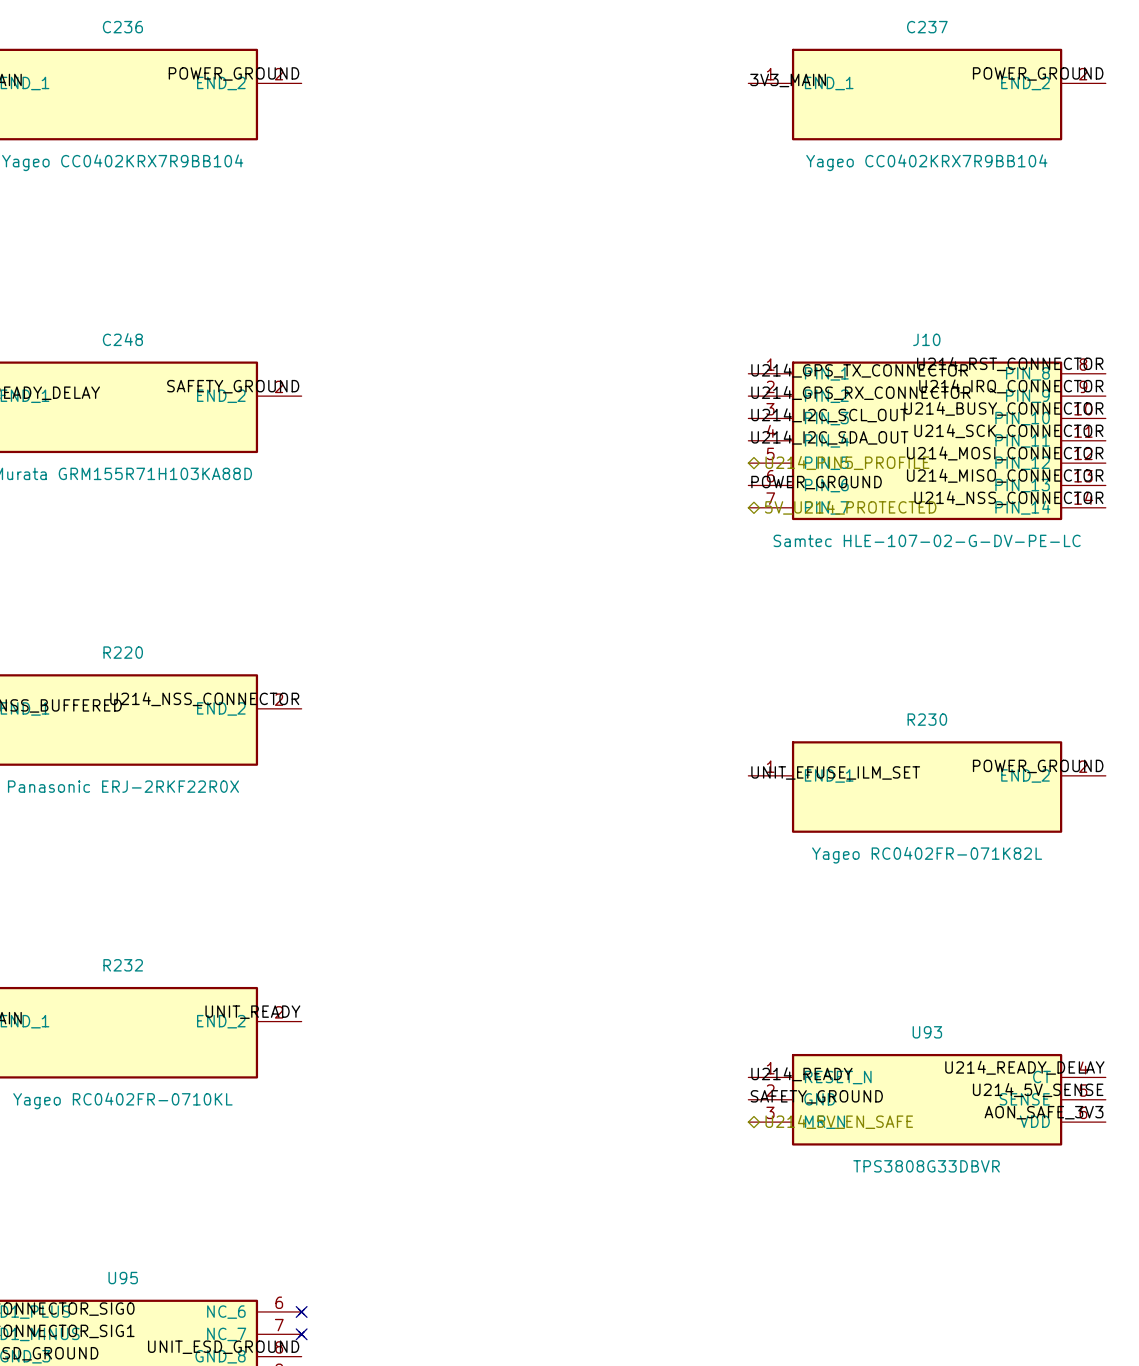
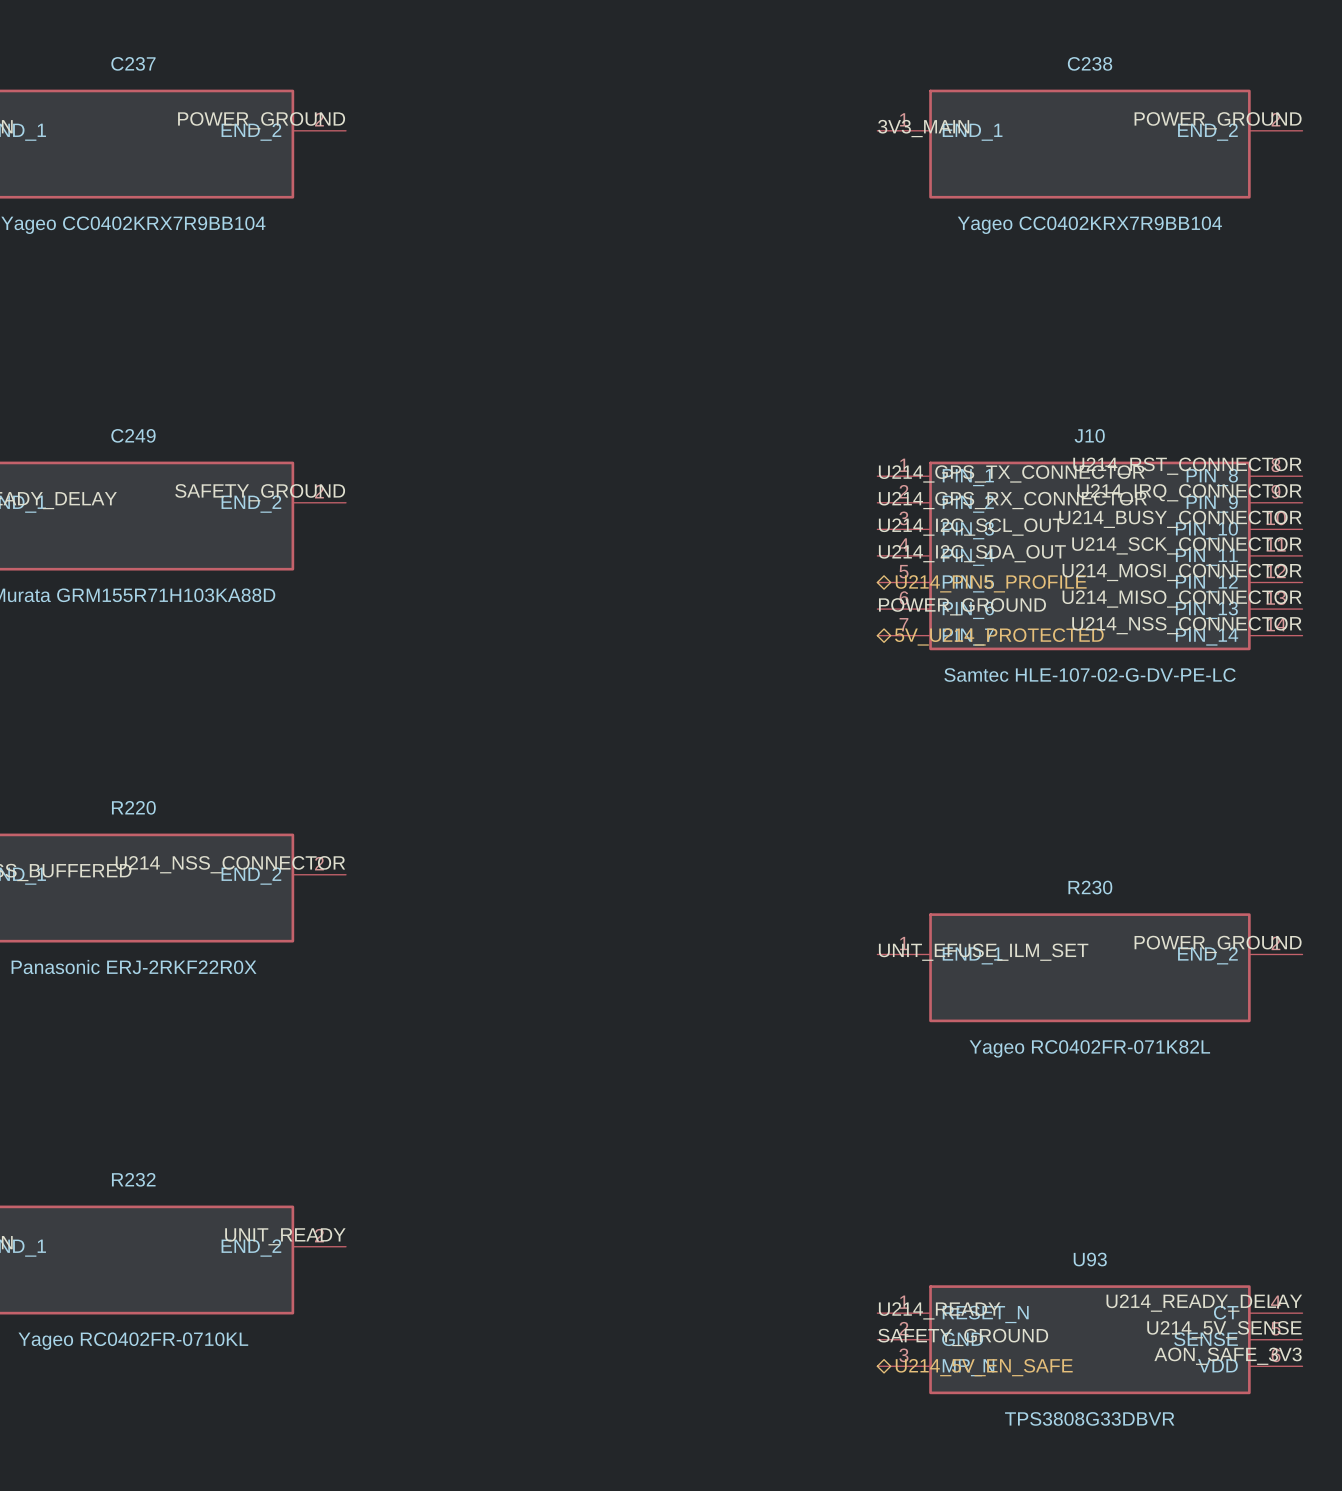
C236 name: C236 (122, 27) -> C237 (133, 63)
C237 name: C237 (927, 27) -> C238 (1090, 63)
C248 name: C248 (122, 339) -> C249 (133, 435)

